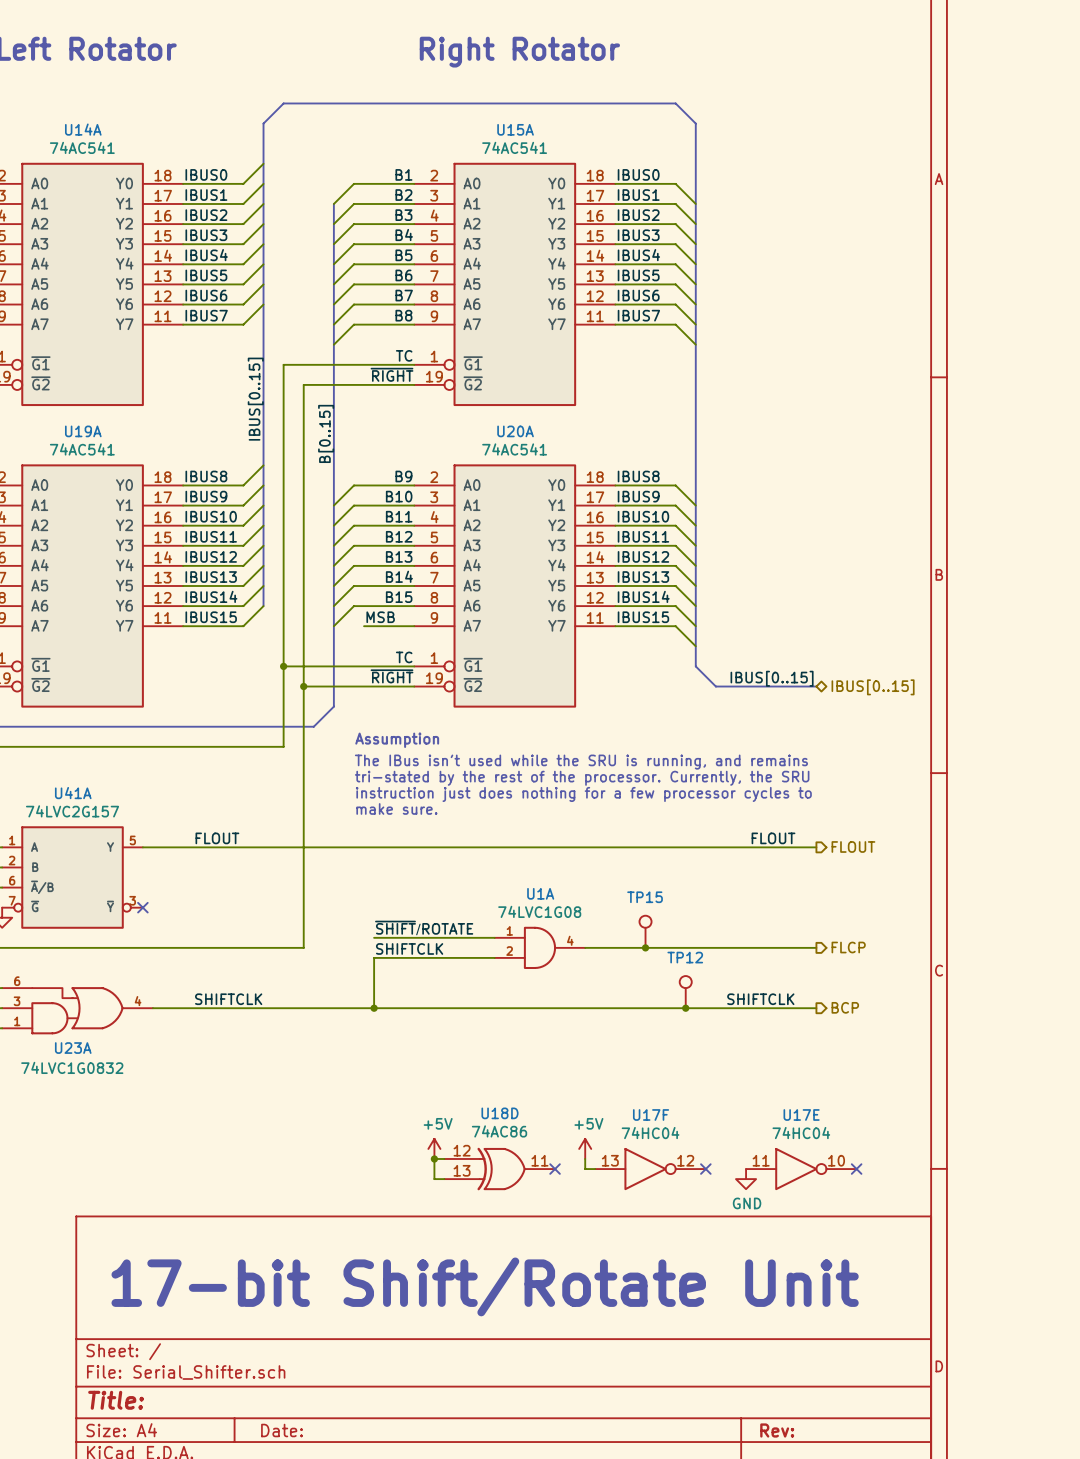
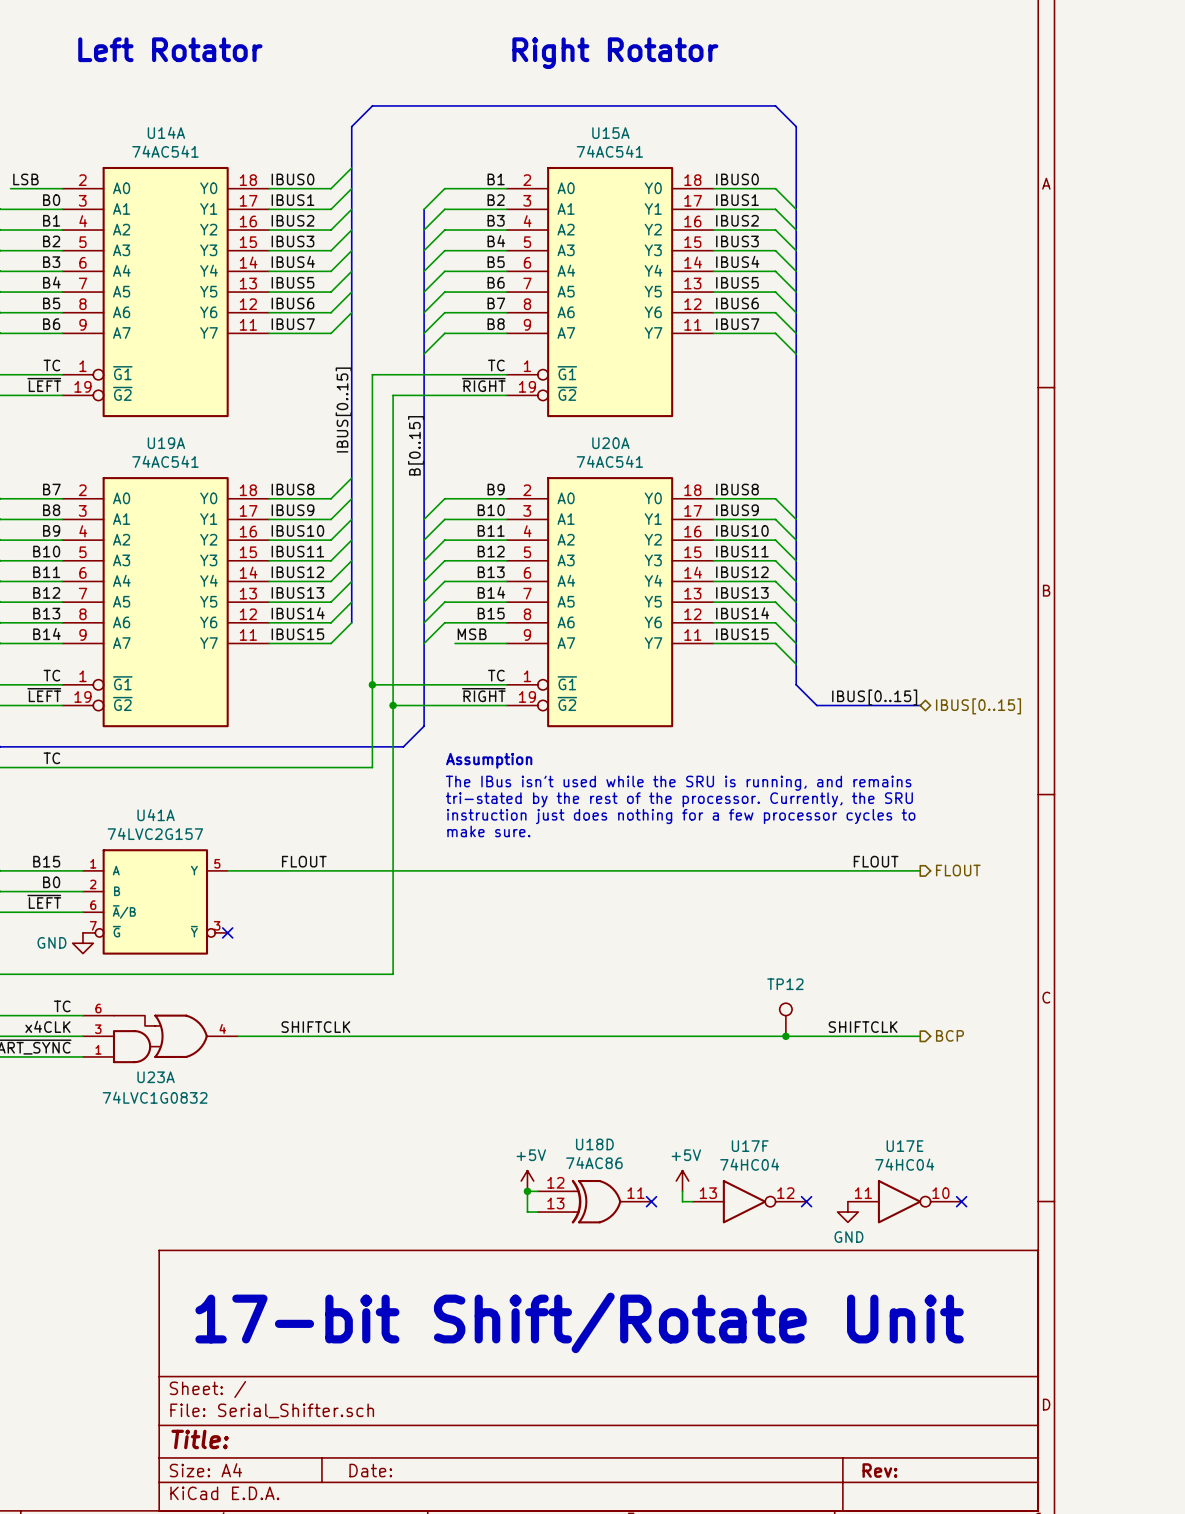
label: ~{SHIFT}∕ROTATE (424, 928) -> none
TP15: (645, 931) -> none
wire: (374, 937) (494, 937) -> none
U1A: 74LVC1G08 (539, 947) -> none
wire: (585, 947) (816, 947) -> none
junction: (645, 947) -> none
hierarchical label: FLCP (848, 947) -> none
label: SHIFTCLK (409, 948) -> none
wire: (494, 957) (374, 957) (374, 1008) -> none
junction: (374, 1008) -> none

